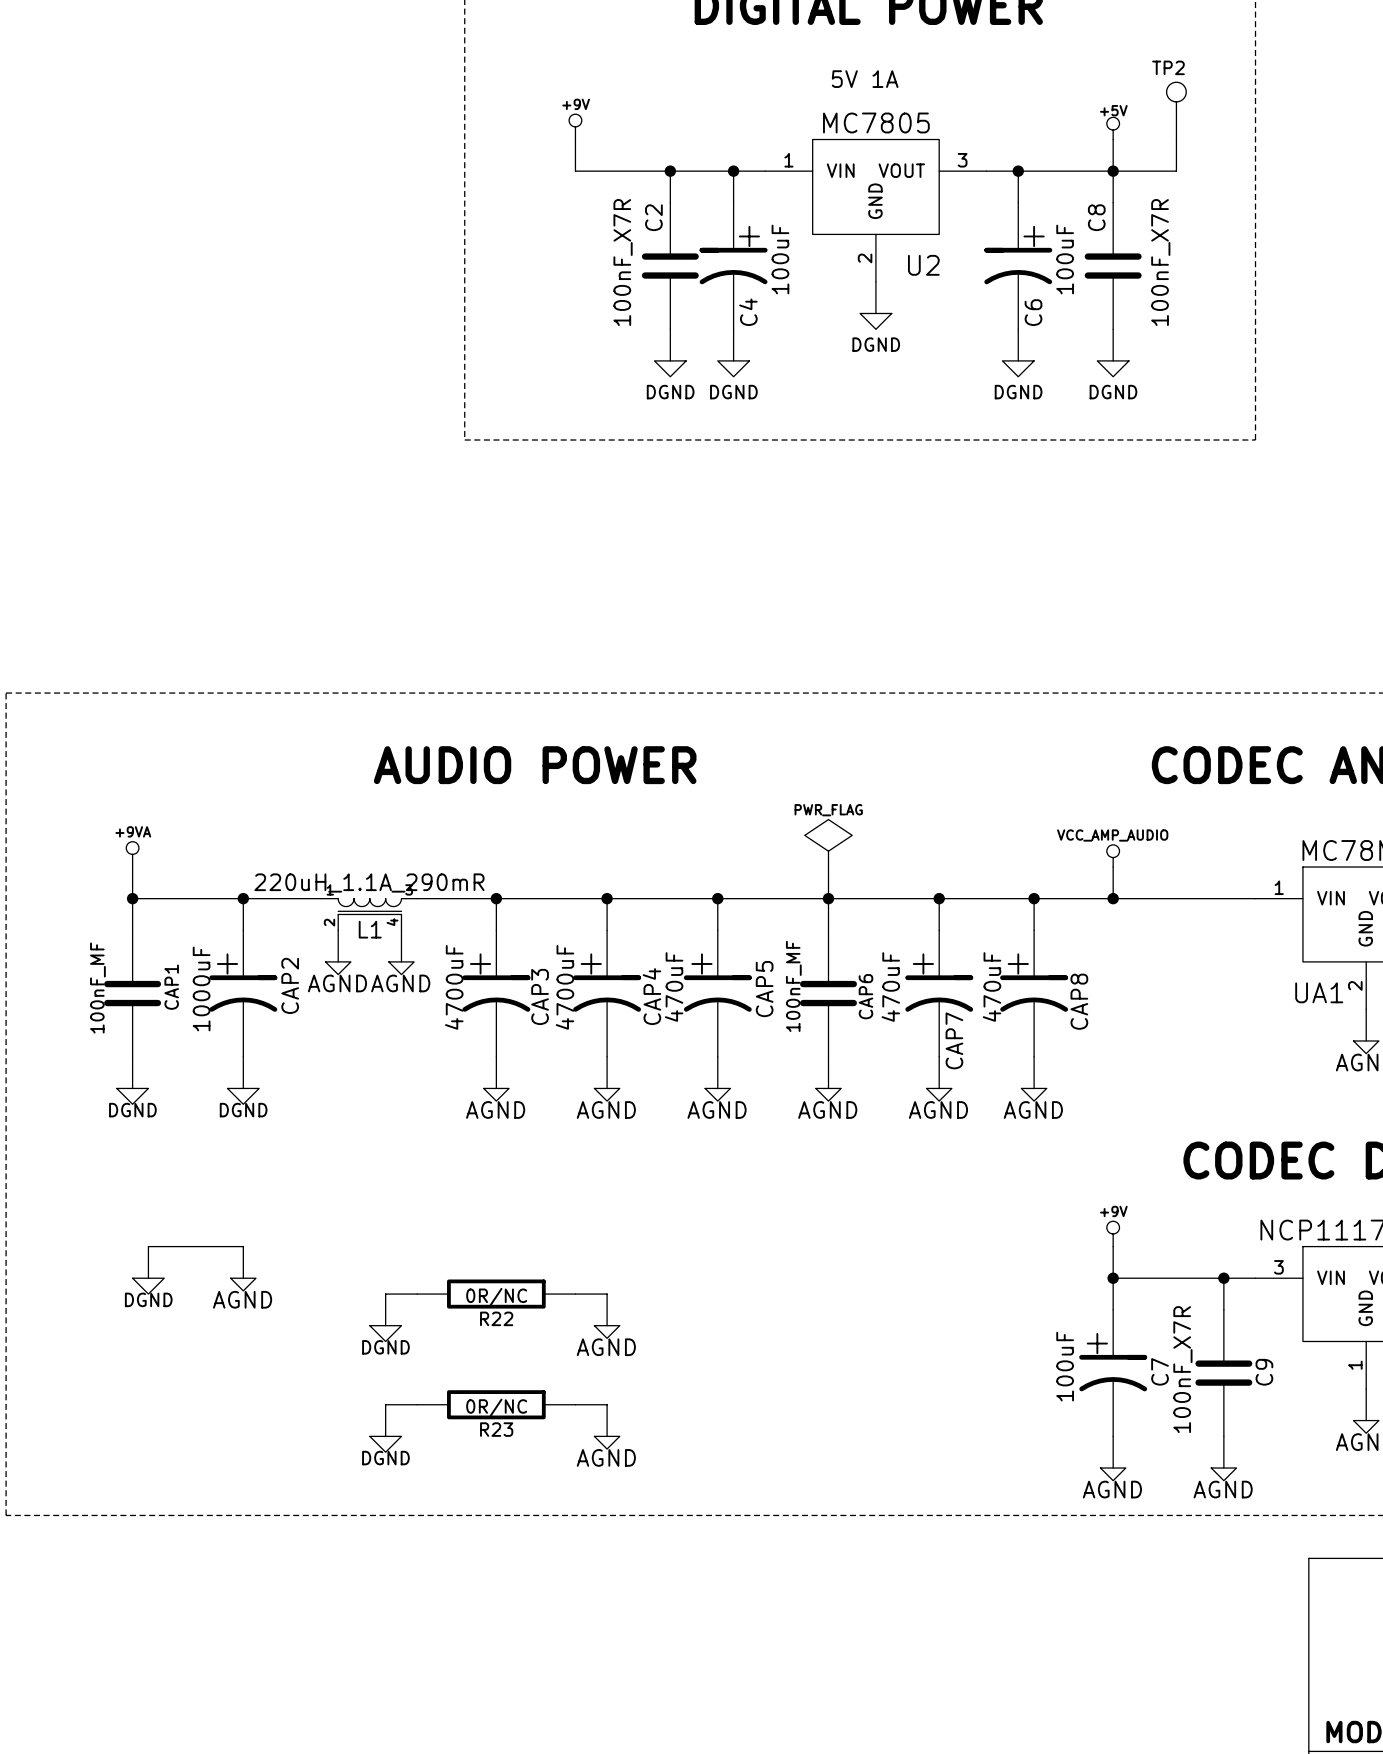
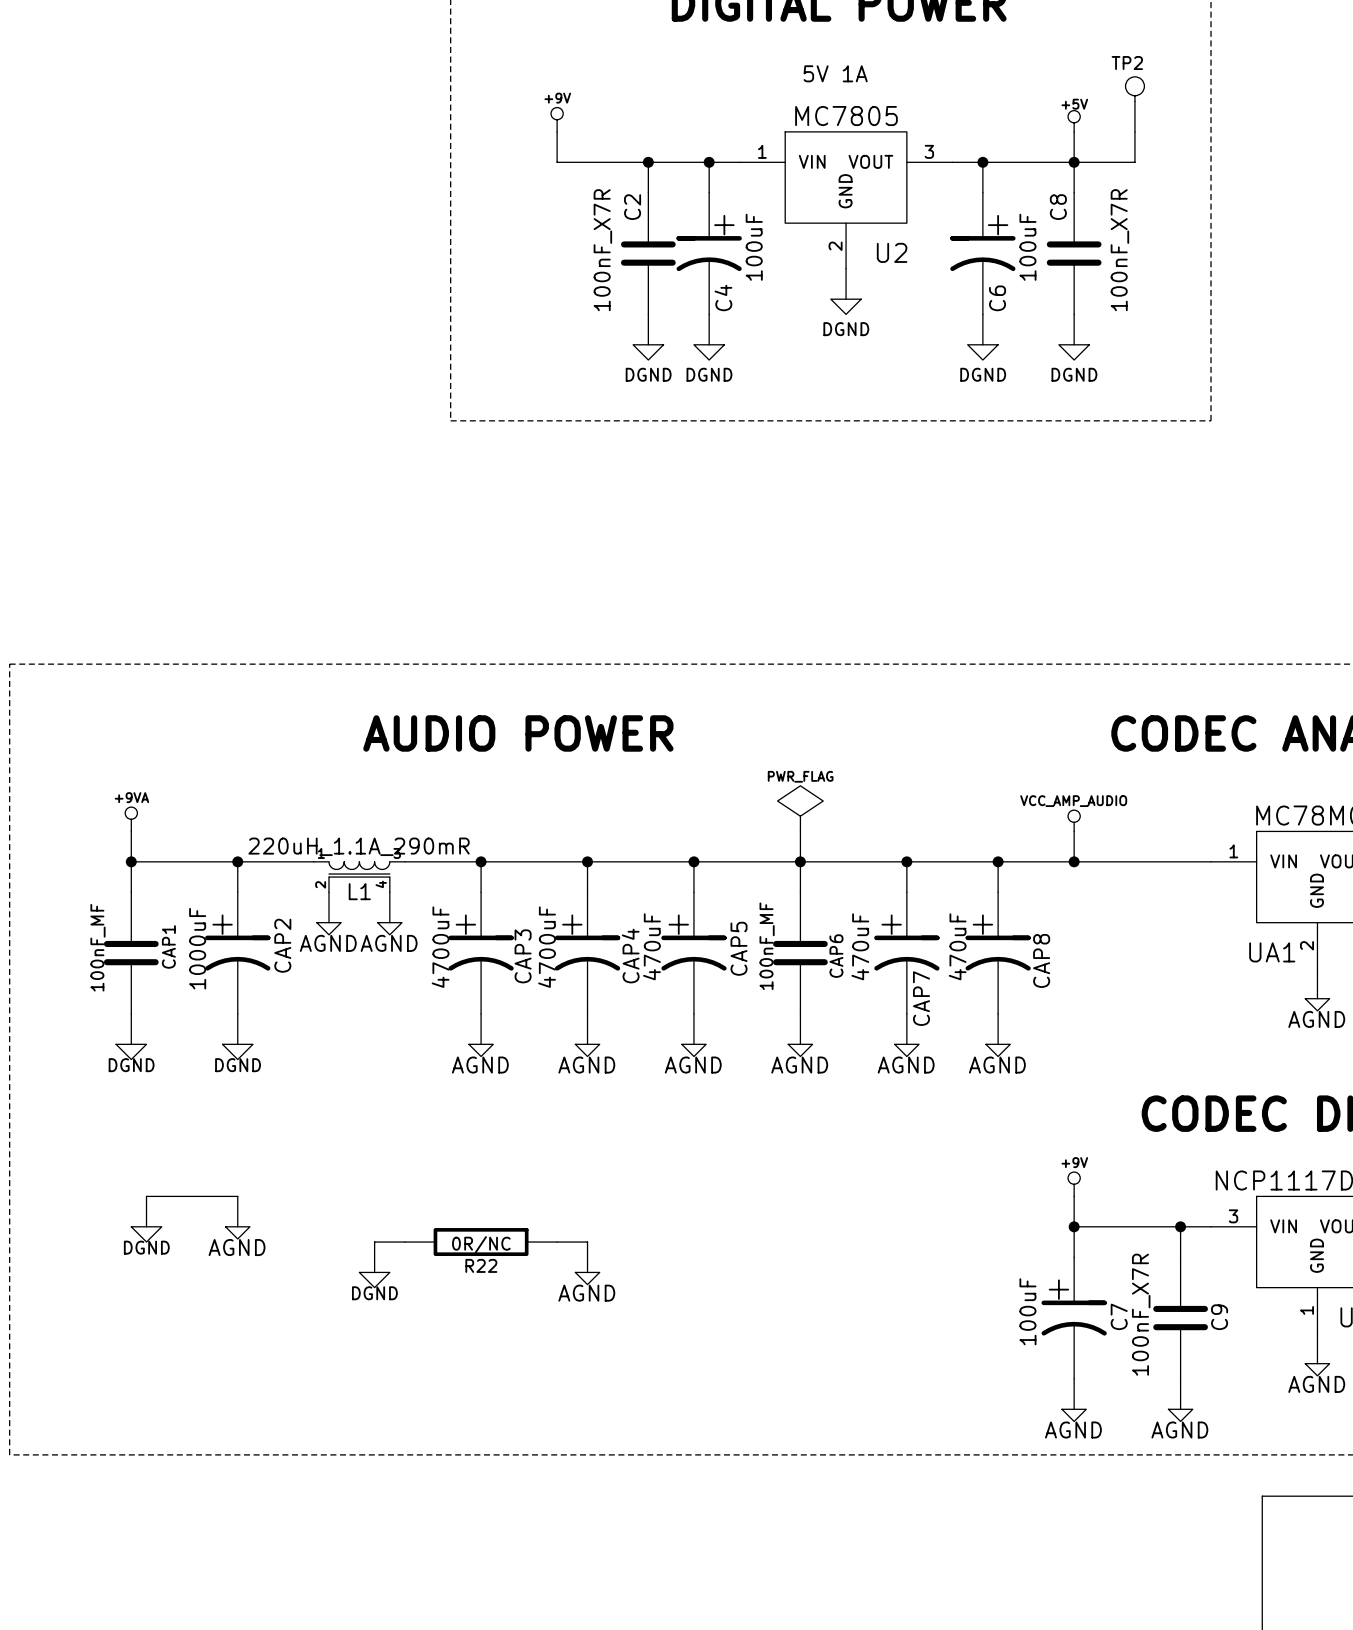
wire: (417, 1404) (385, 1404) (385, 1436) -> none
R23: 0R/NC (496, 1404) -> none
wire: (575, 1404) (607, 1404) (607, 1436) -> none
power symbol: AGND (607, 1442) -> none
power symbol: DGND (385, 1444) -> none

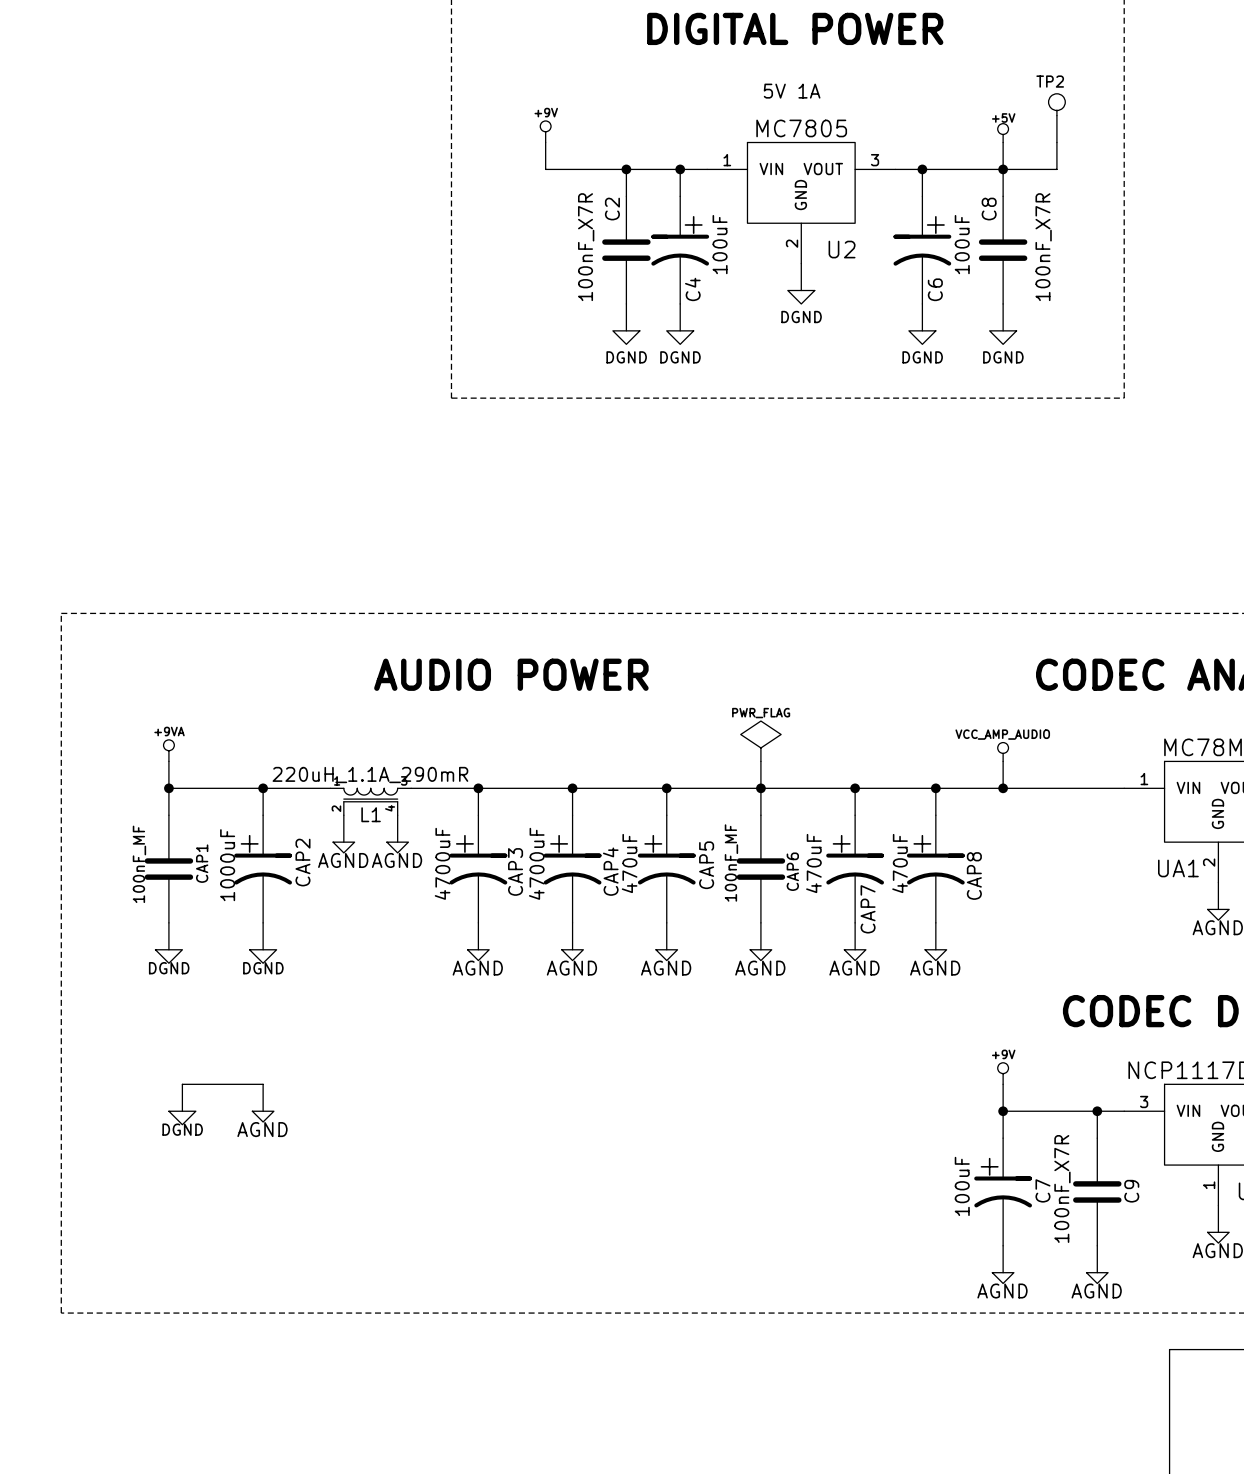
wire: (405, 1242) (374, 1242) (374, 1272) -> none
R22: 0R/NC (481, 1242) -> none
wire: (557, 1242) (587, 1242) (587, 1272) -> none
power symbol: AGND (587, 1278) -> none
power symbol: DGND (374, 1280) -> none

